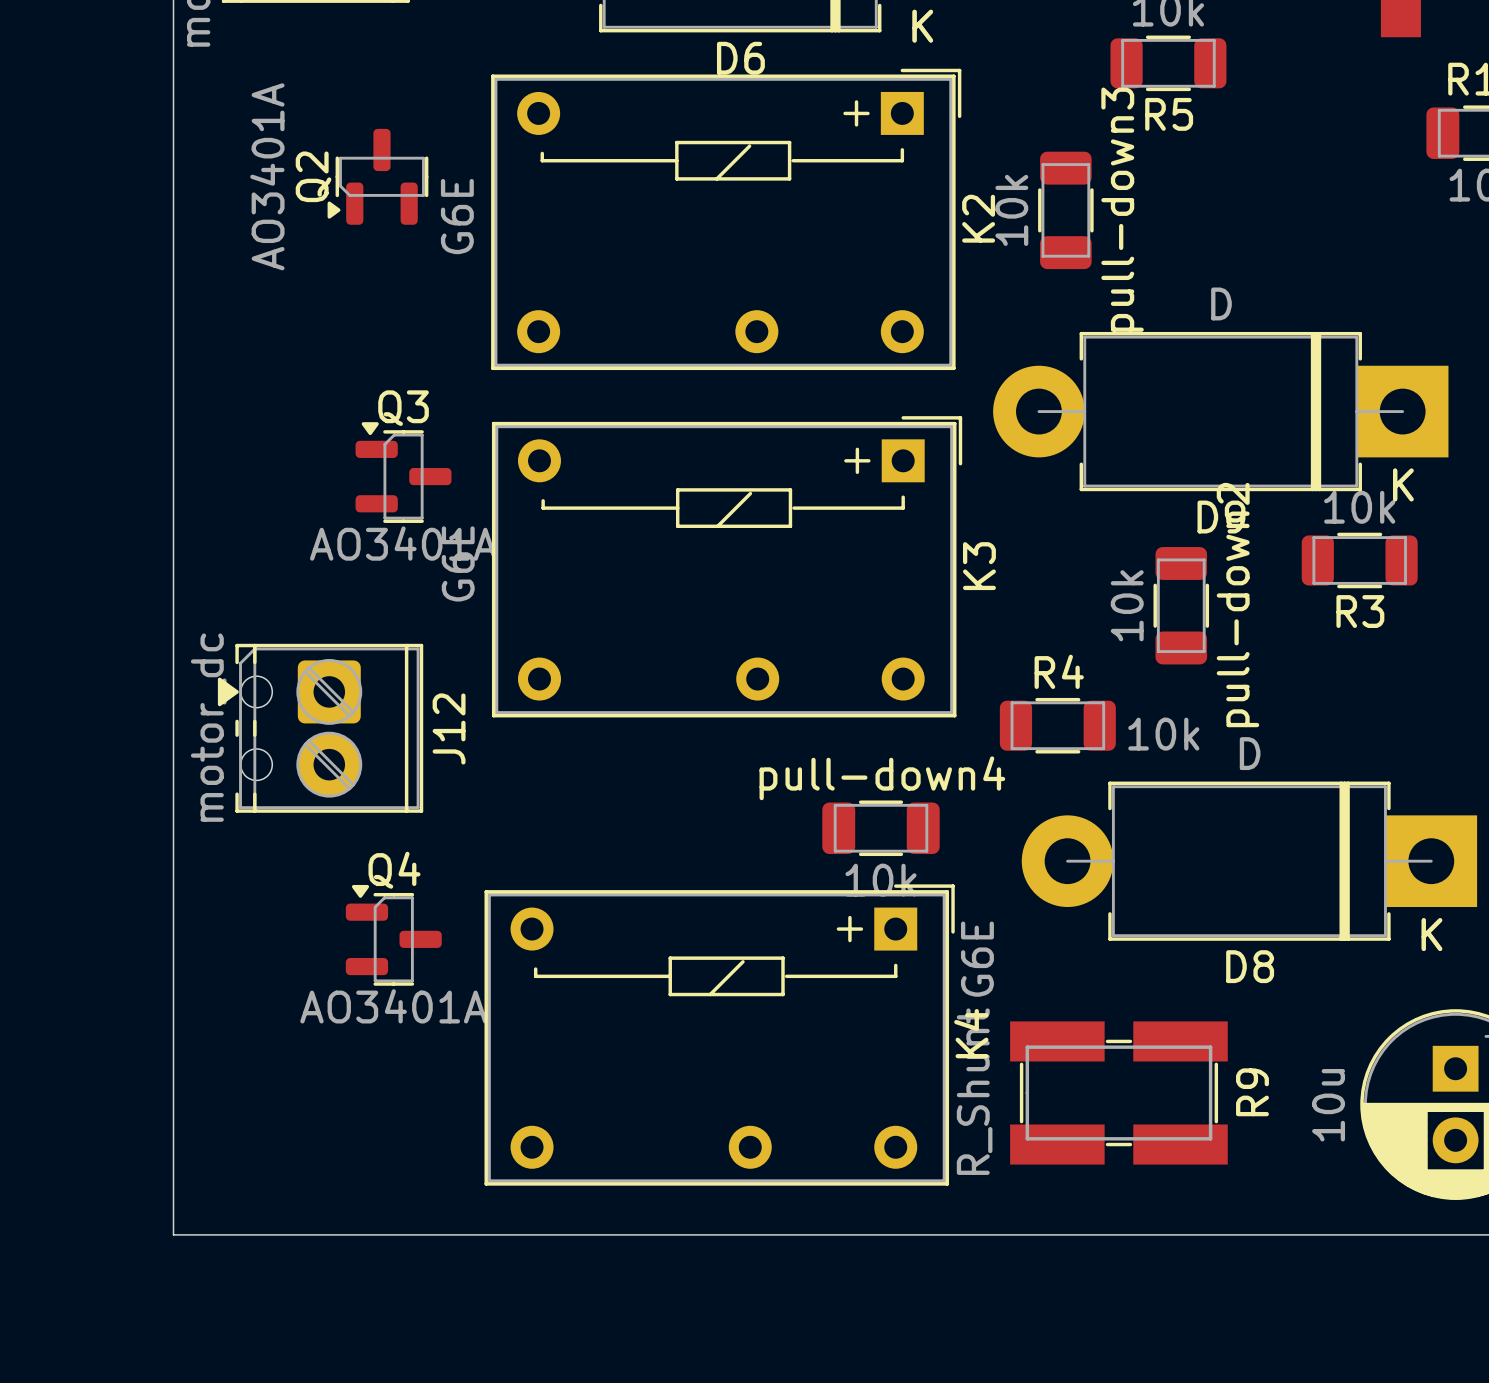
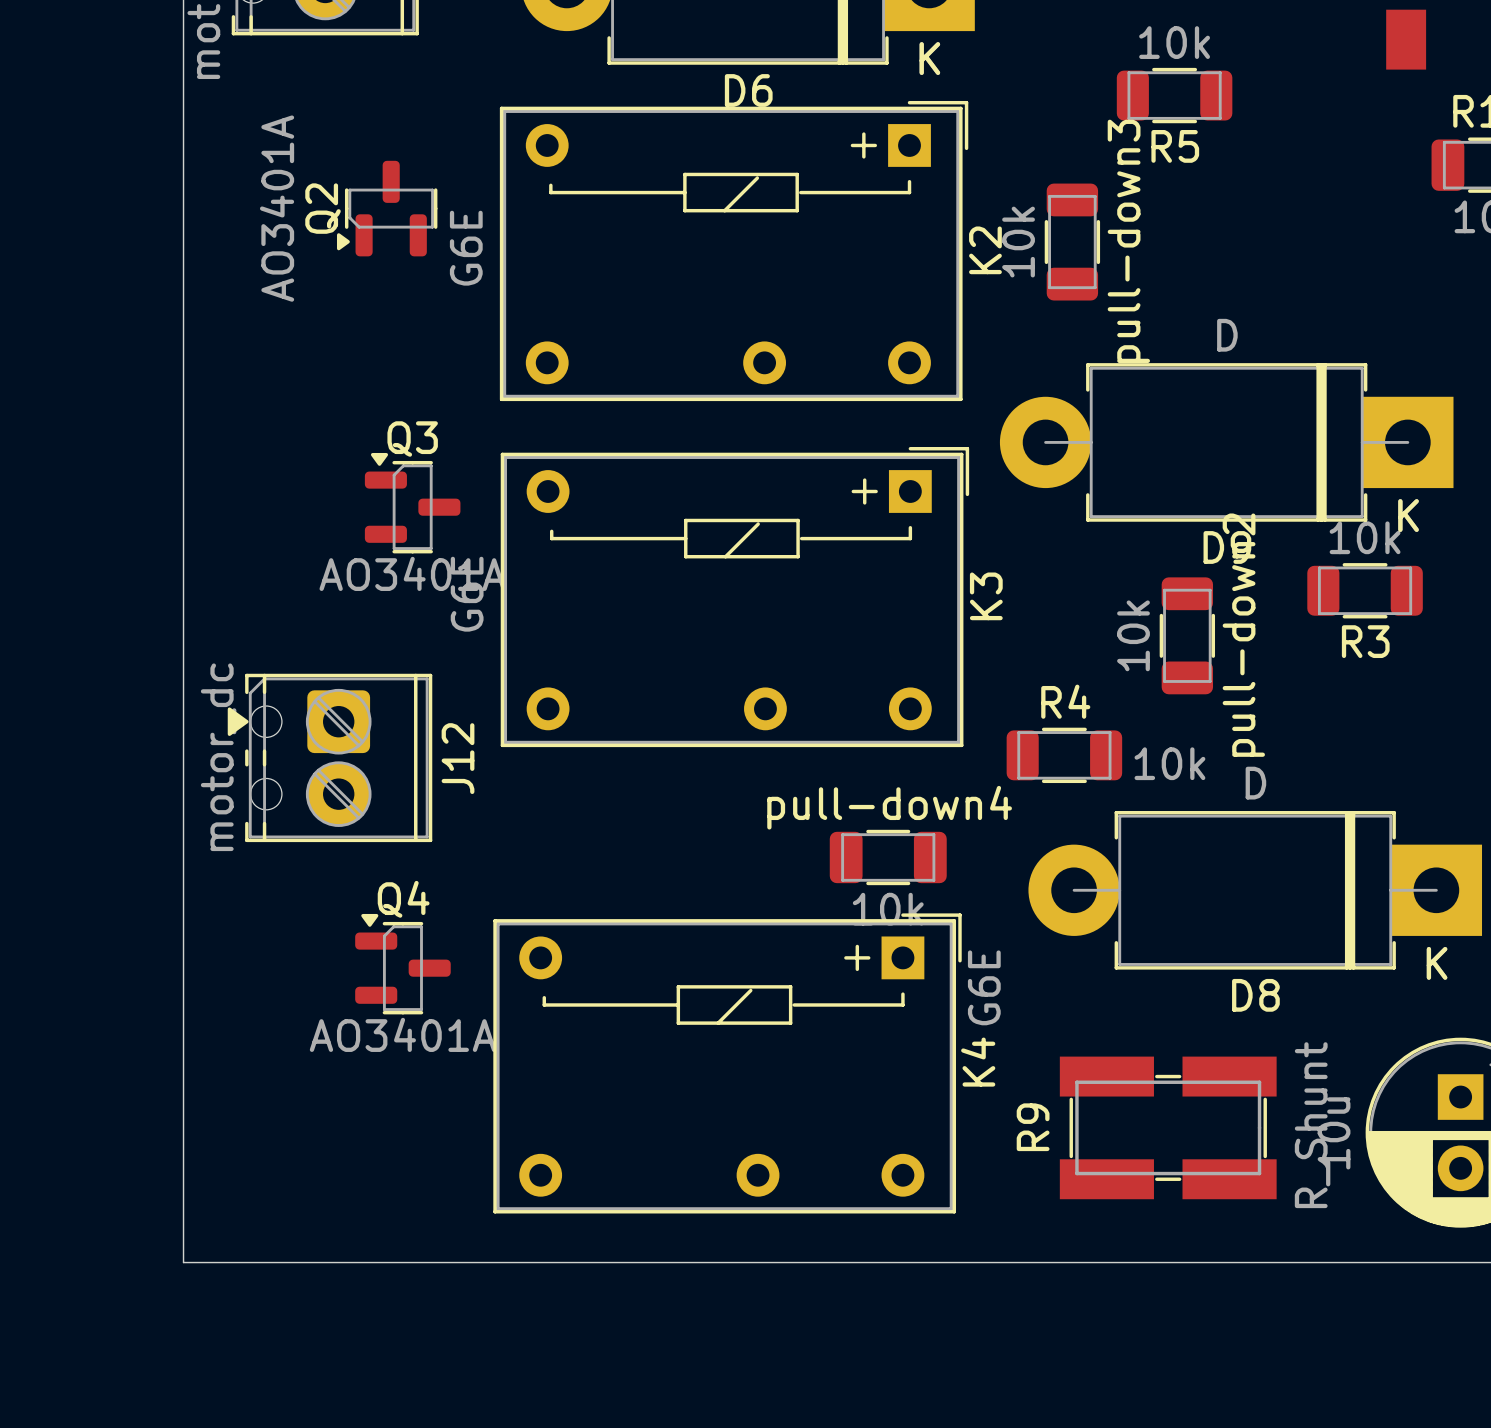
R9 rotation: 0° (1118, 1092) -> 180° (1168, 1127)

